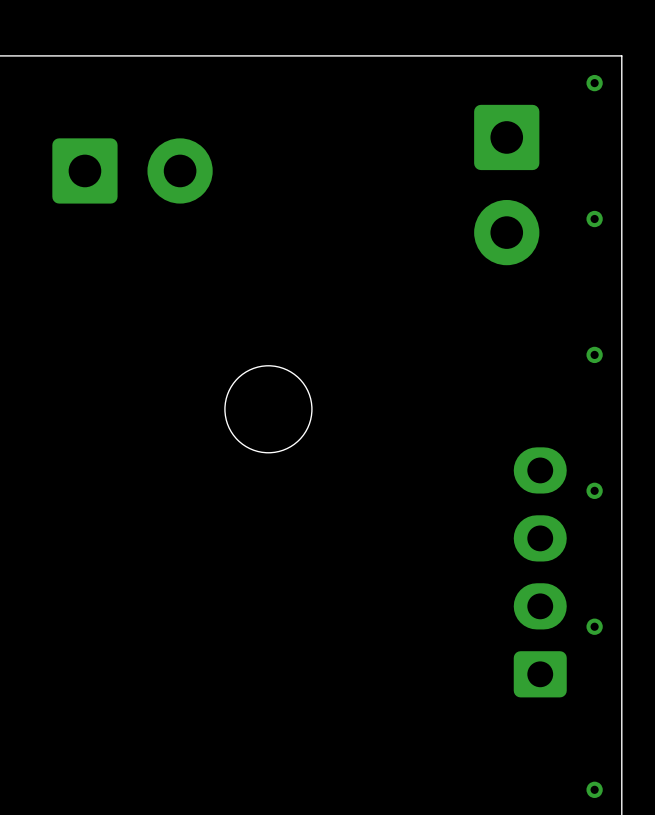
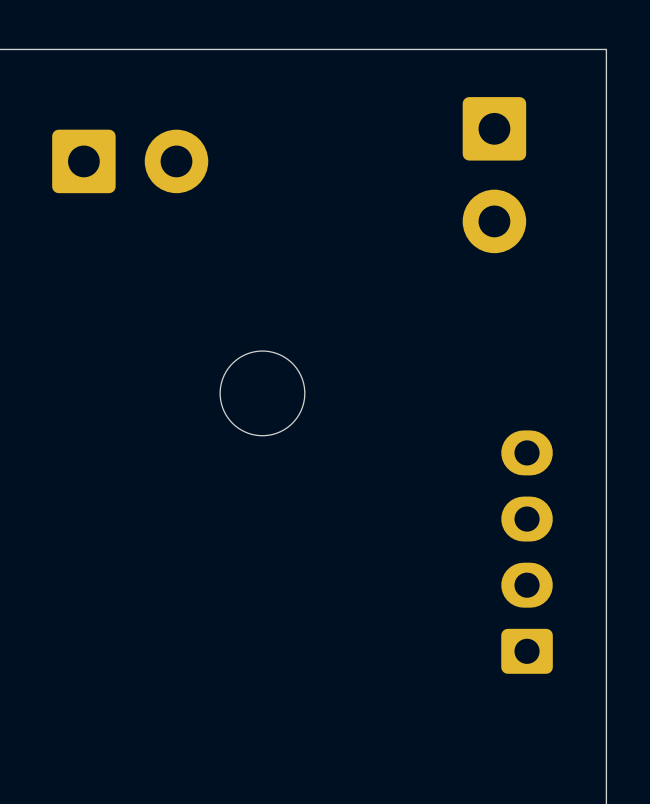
via: (594, 83) -> none
via: (594, 219) -> none
via: (594, 354) -> none
via: (594, 490) -> none
via: (594, 626) -> none
via: (594, 789) -> none

